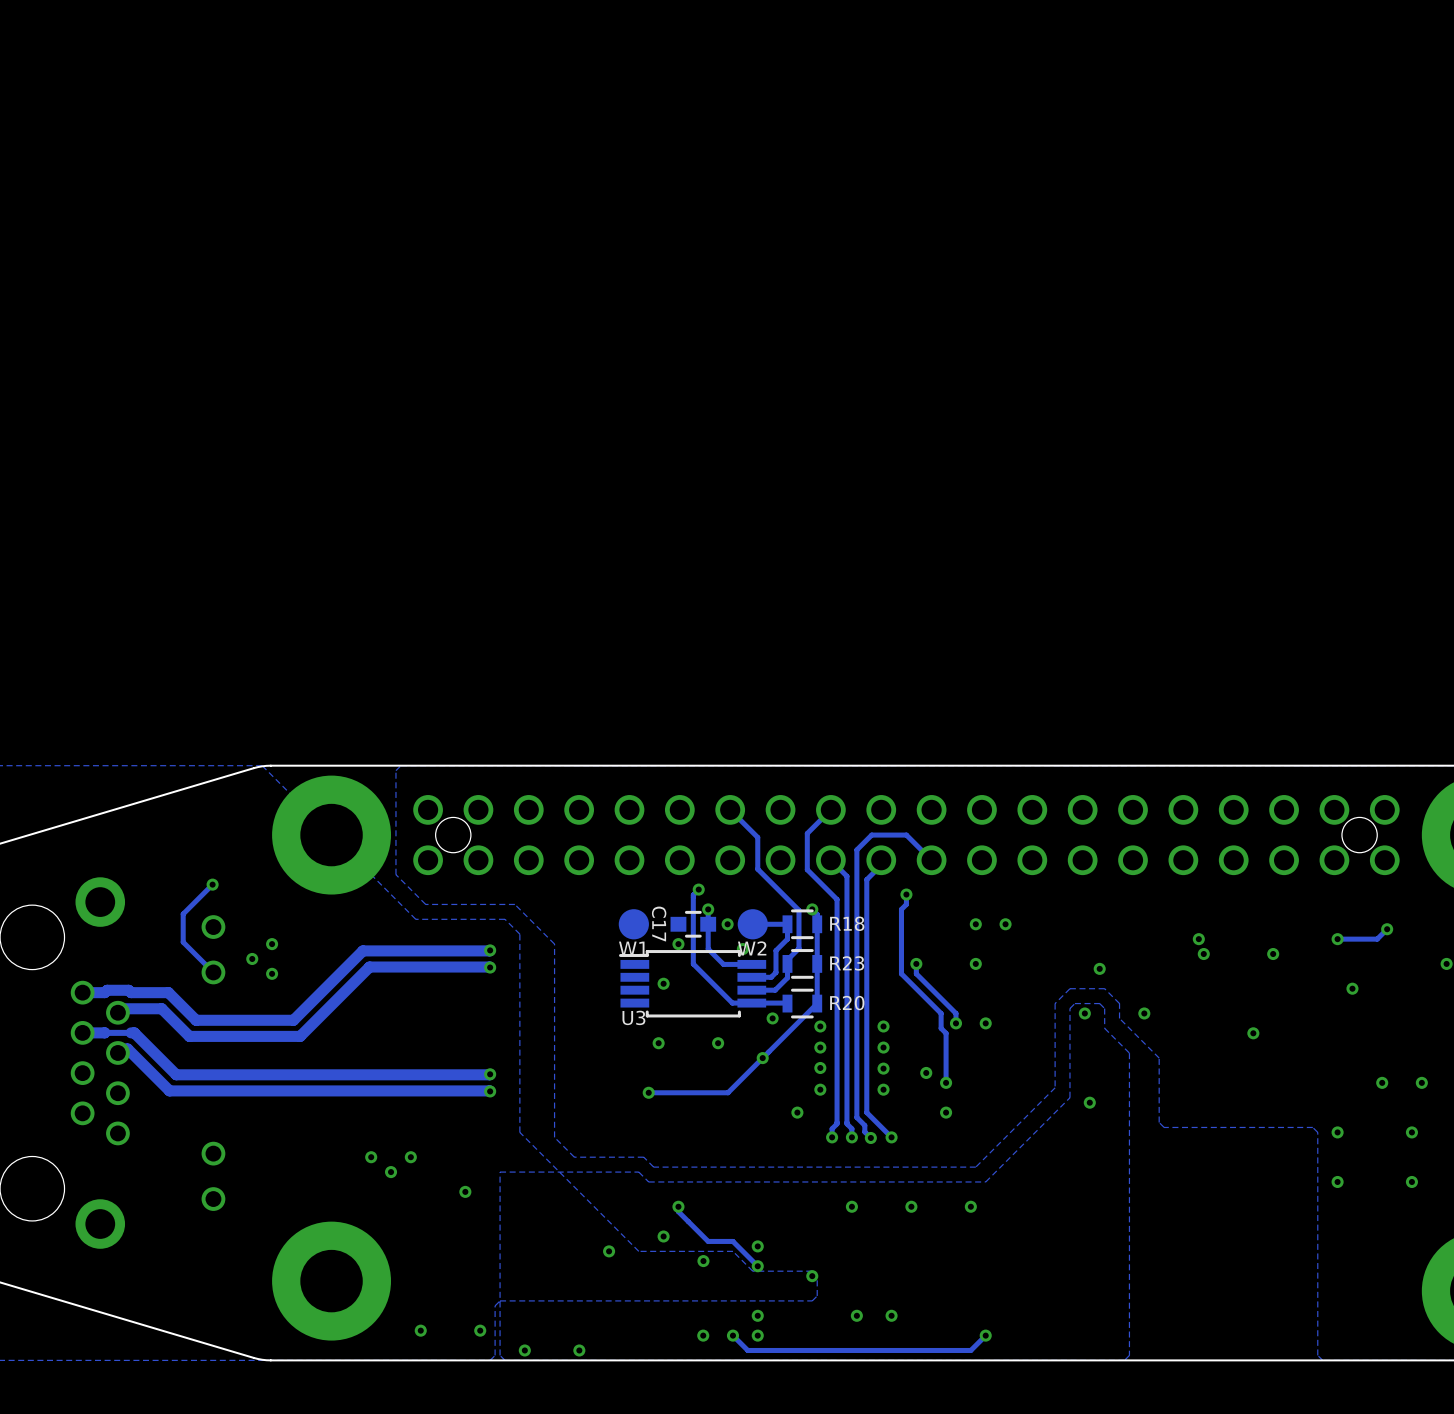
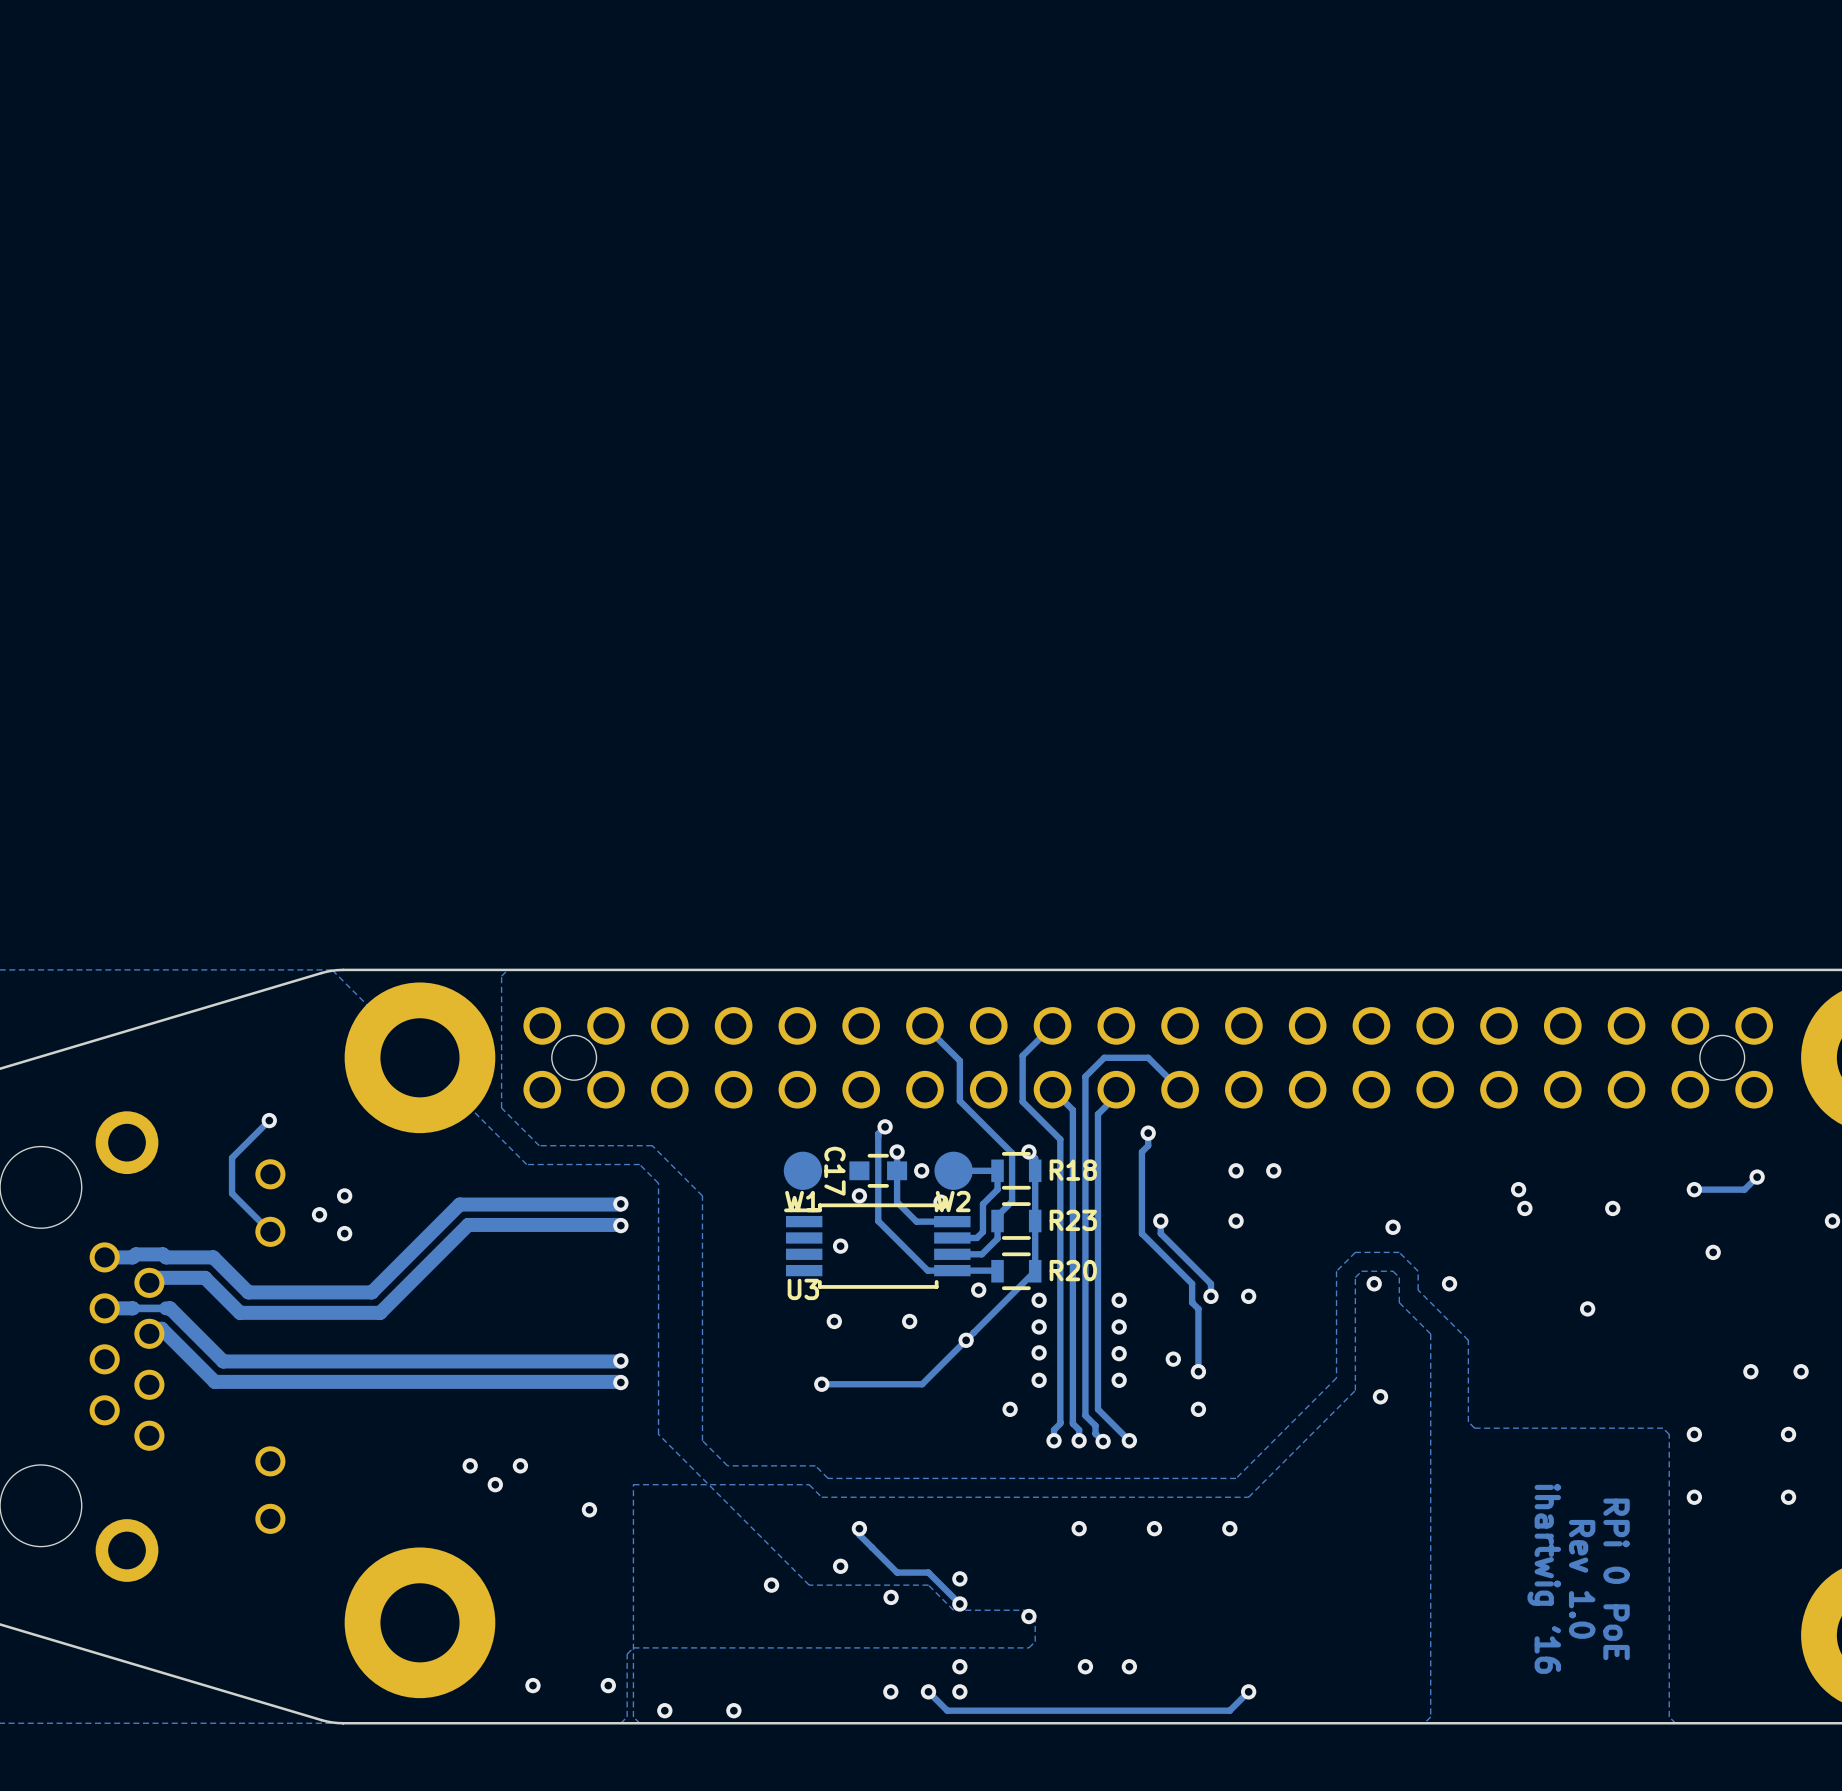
text: none -> ihartwig '16 (1544, 1578)
text: none -> Rev 1.0 (1582, 1579)
text: none -> RPi 0 PoE (1616, 1579)

